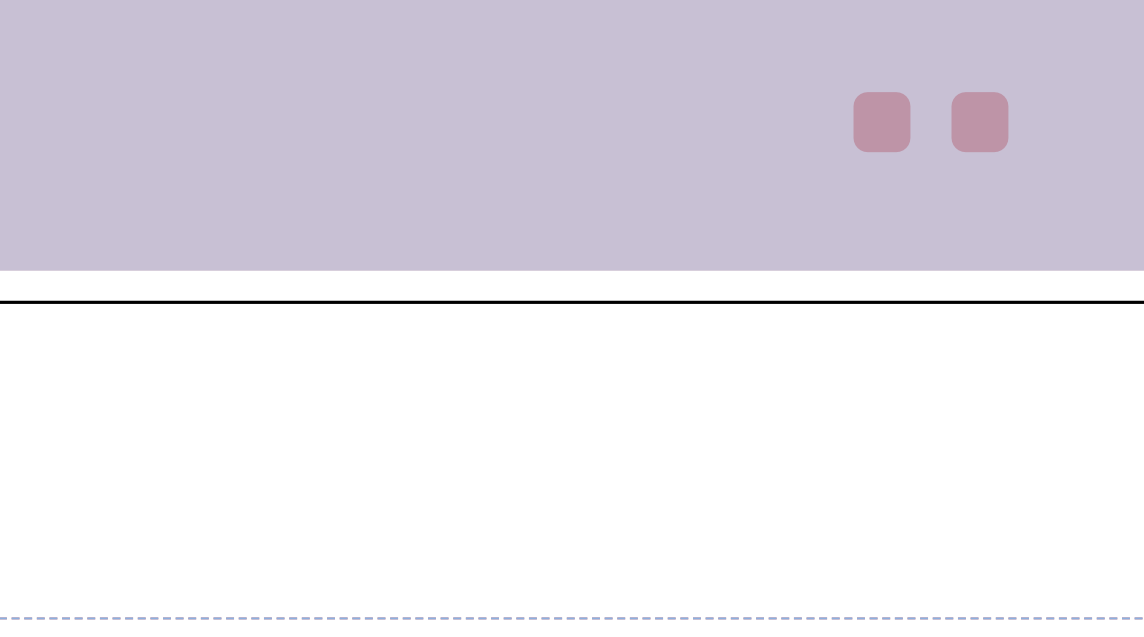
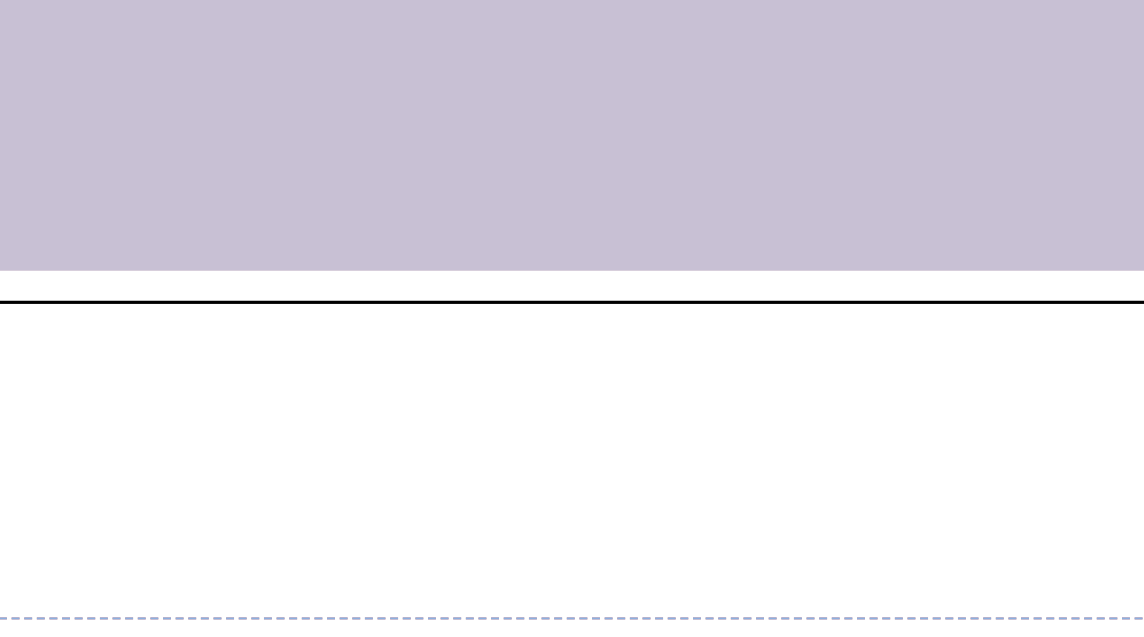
part: (930, 122) -> none

